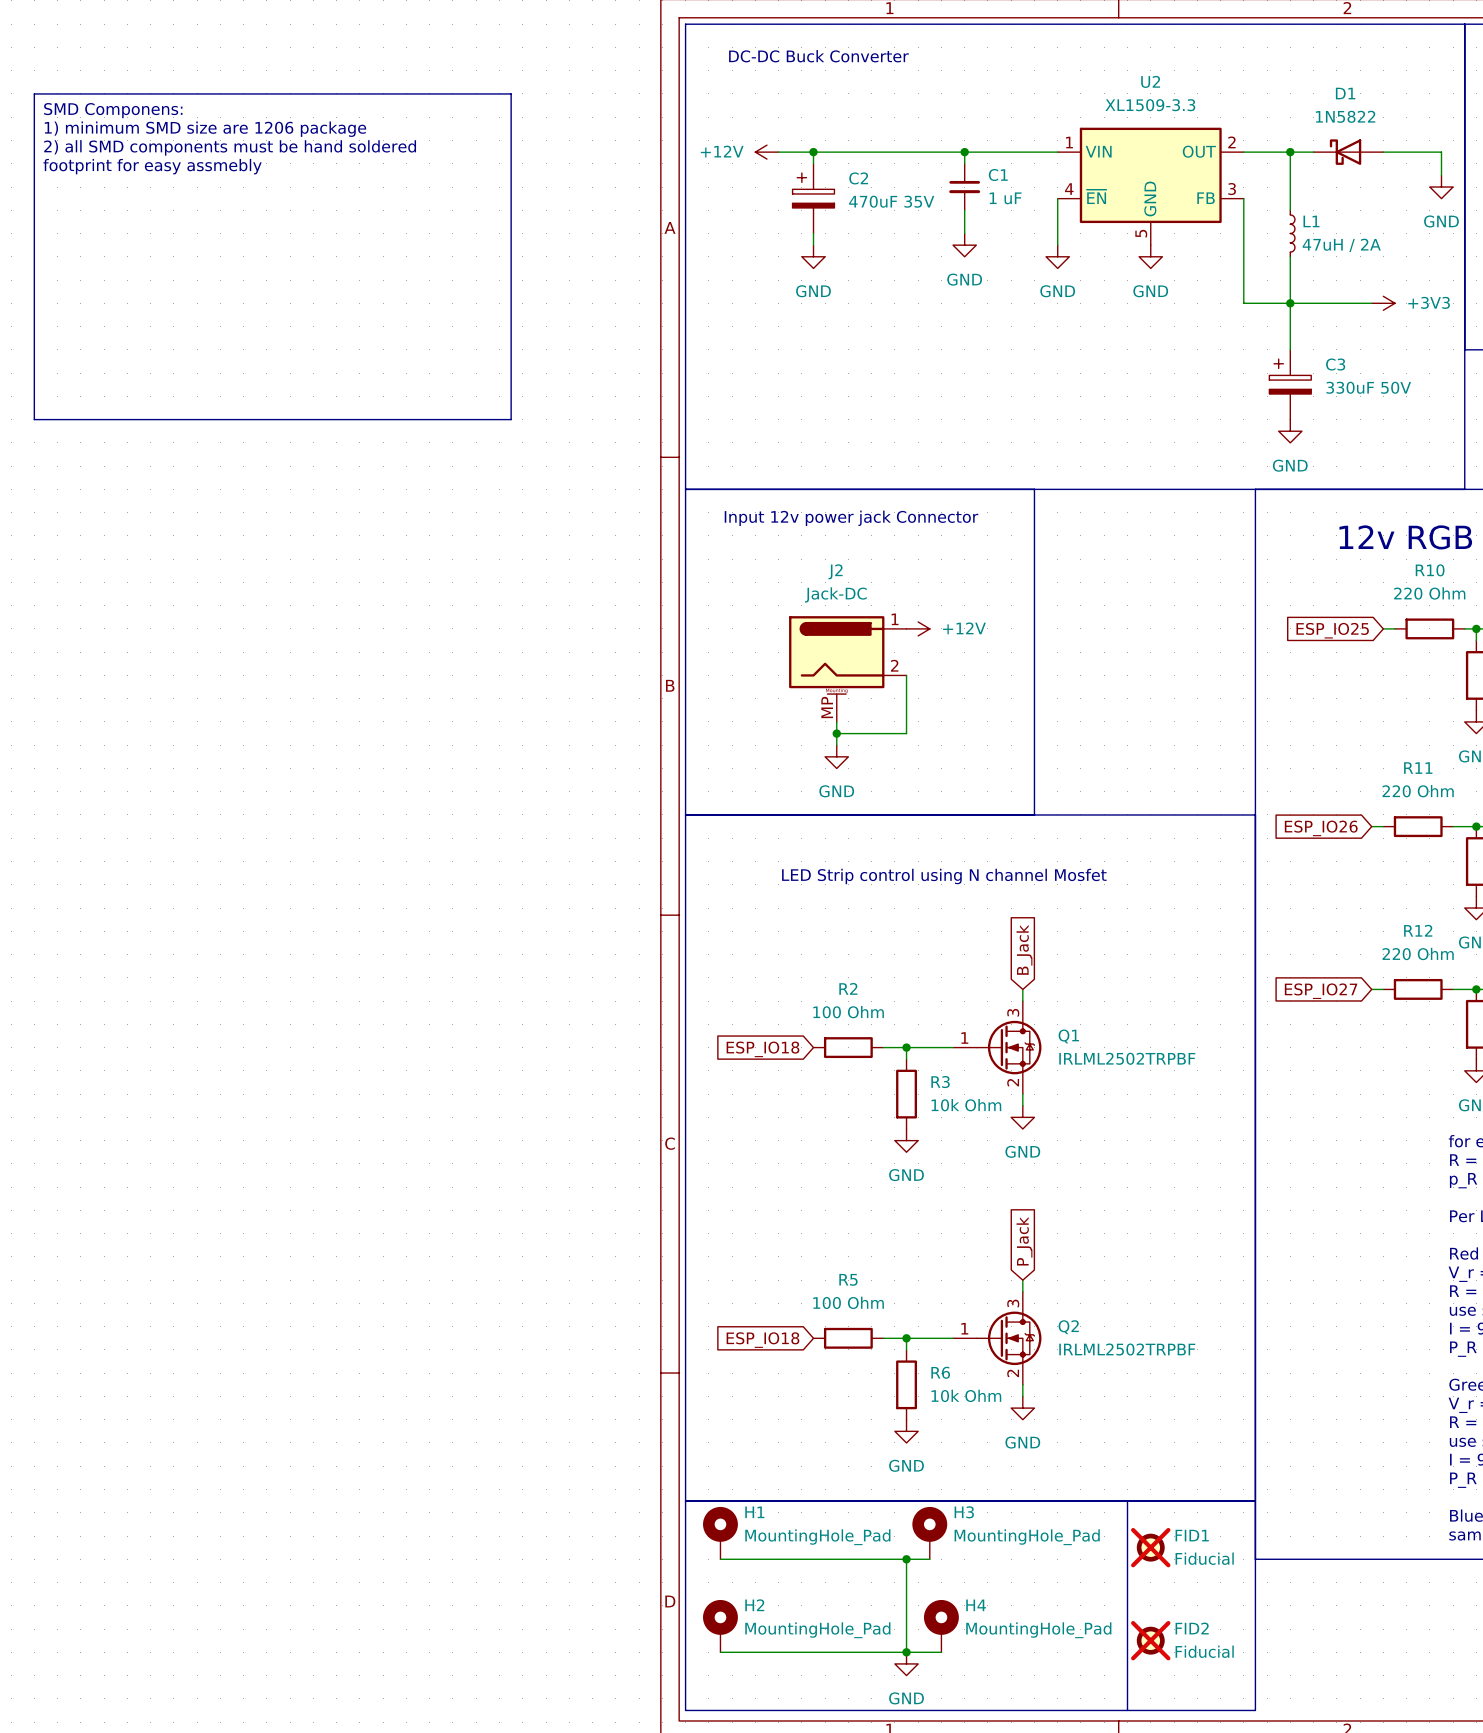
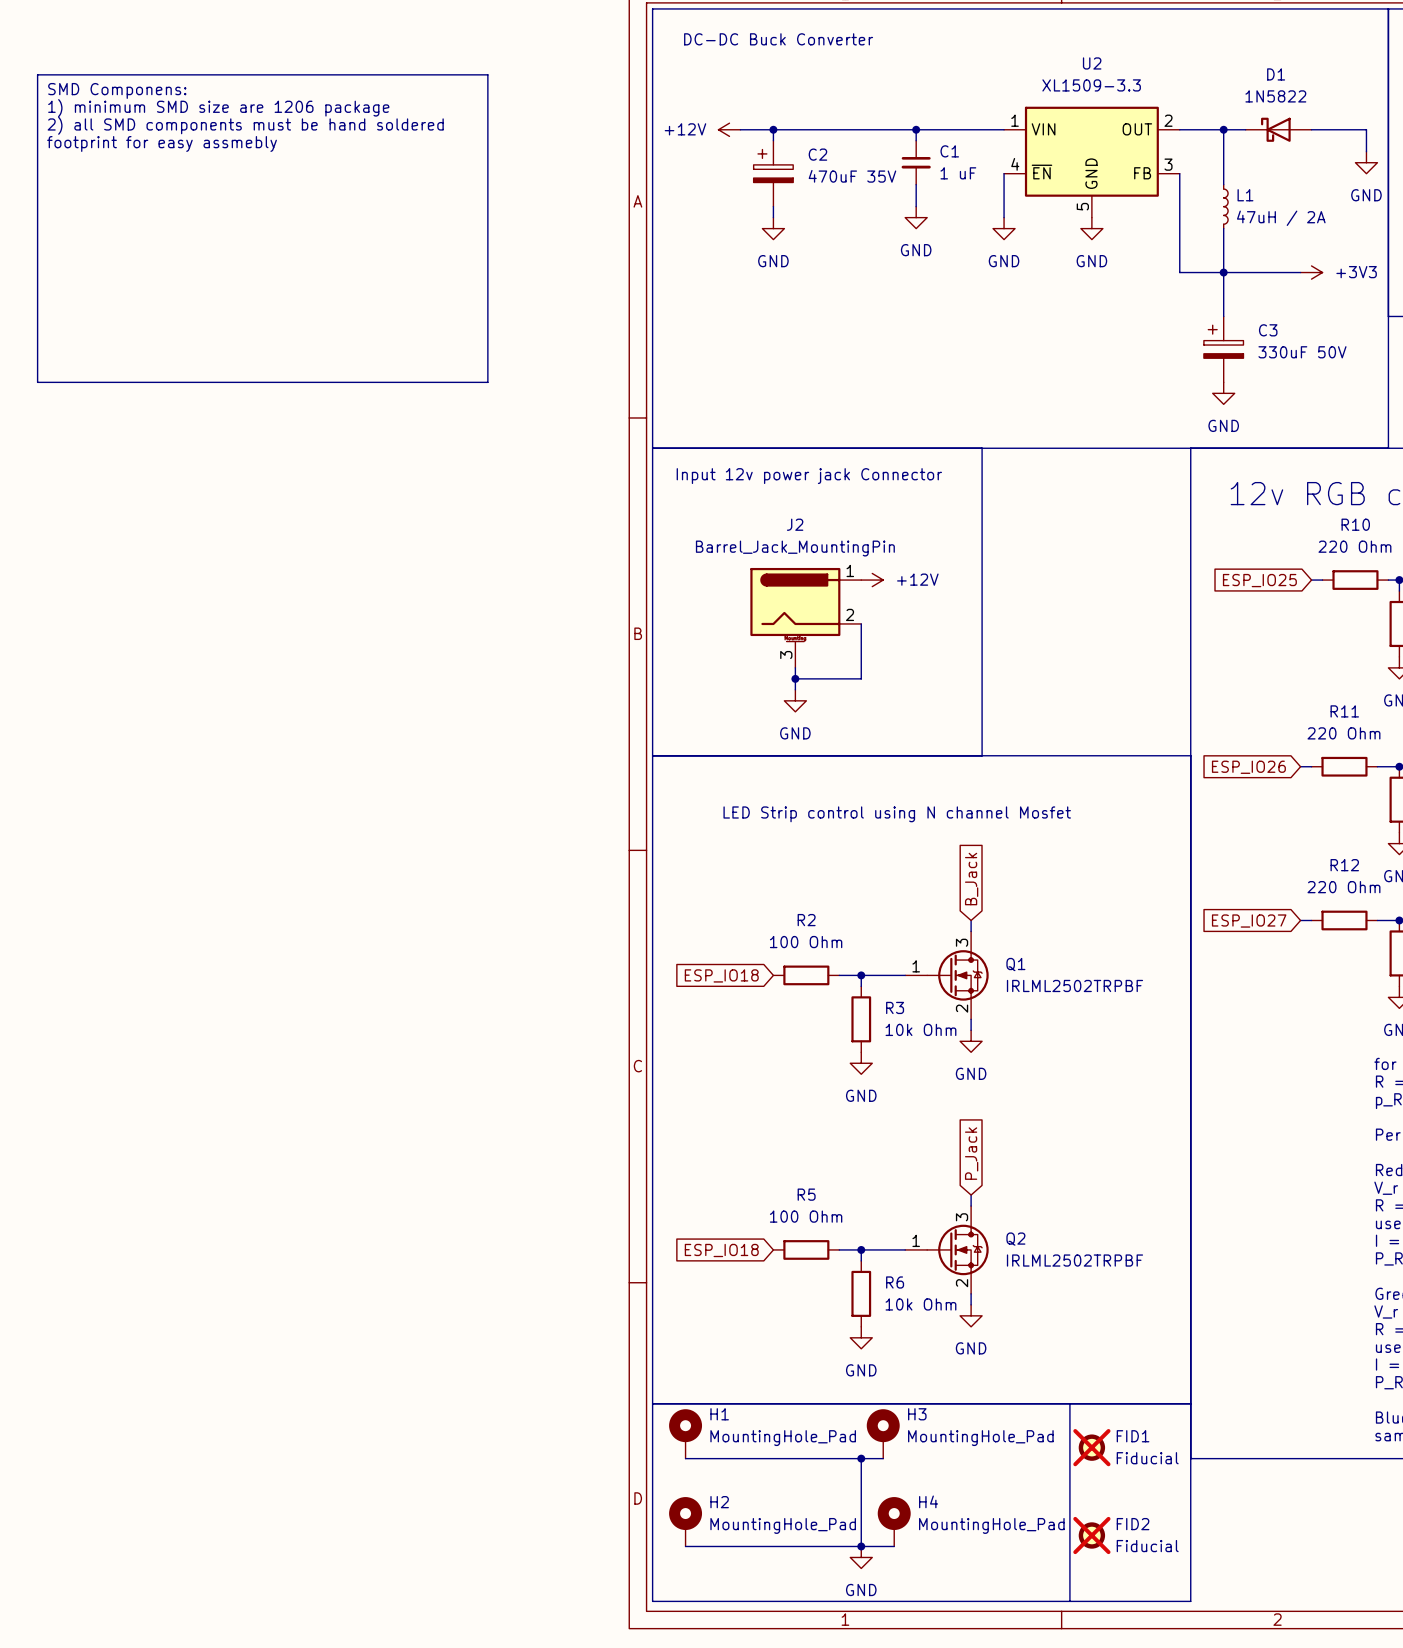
J2 value: Jack-DC (835, 594) -> Barrel_Jack_MountingPin (795, 548)
J2 pin number: MP (827, 707) -> 3 (786, 654)

